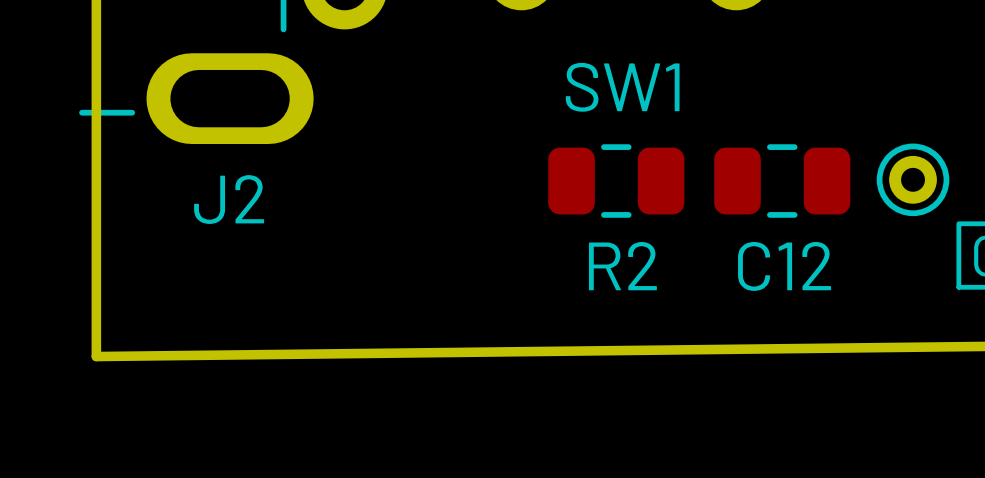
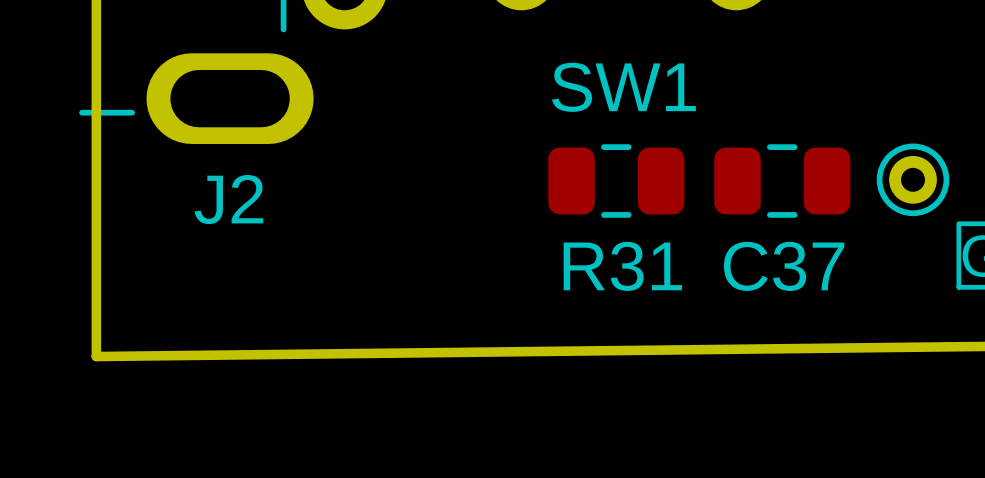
R2 name: R2 (622, 266) -> R31 (622, 266)
C12 name: C12 (784, 266) -> C37 (784, 266)

